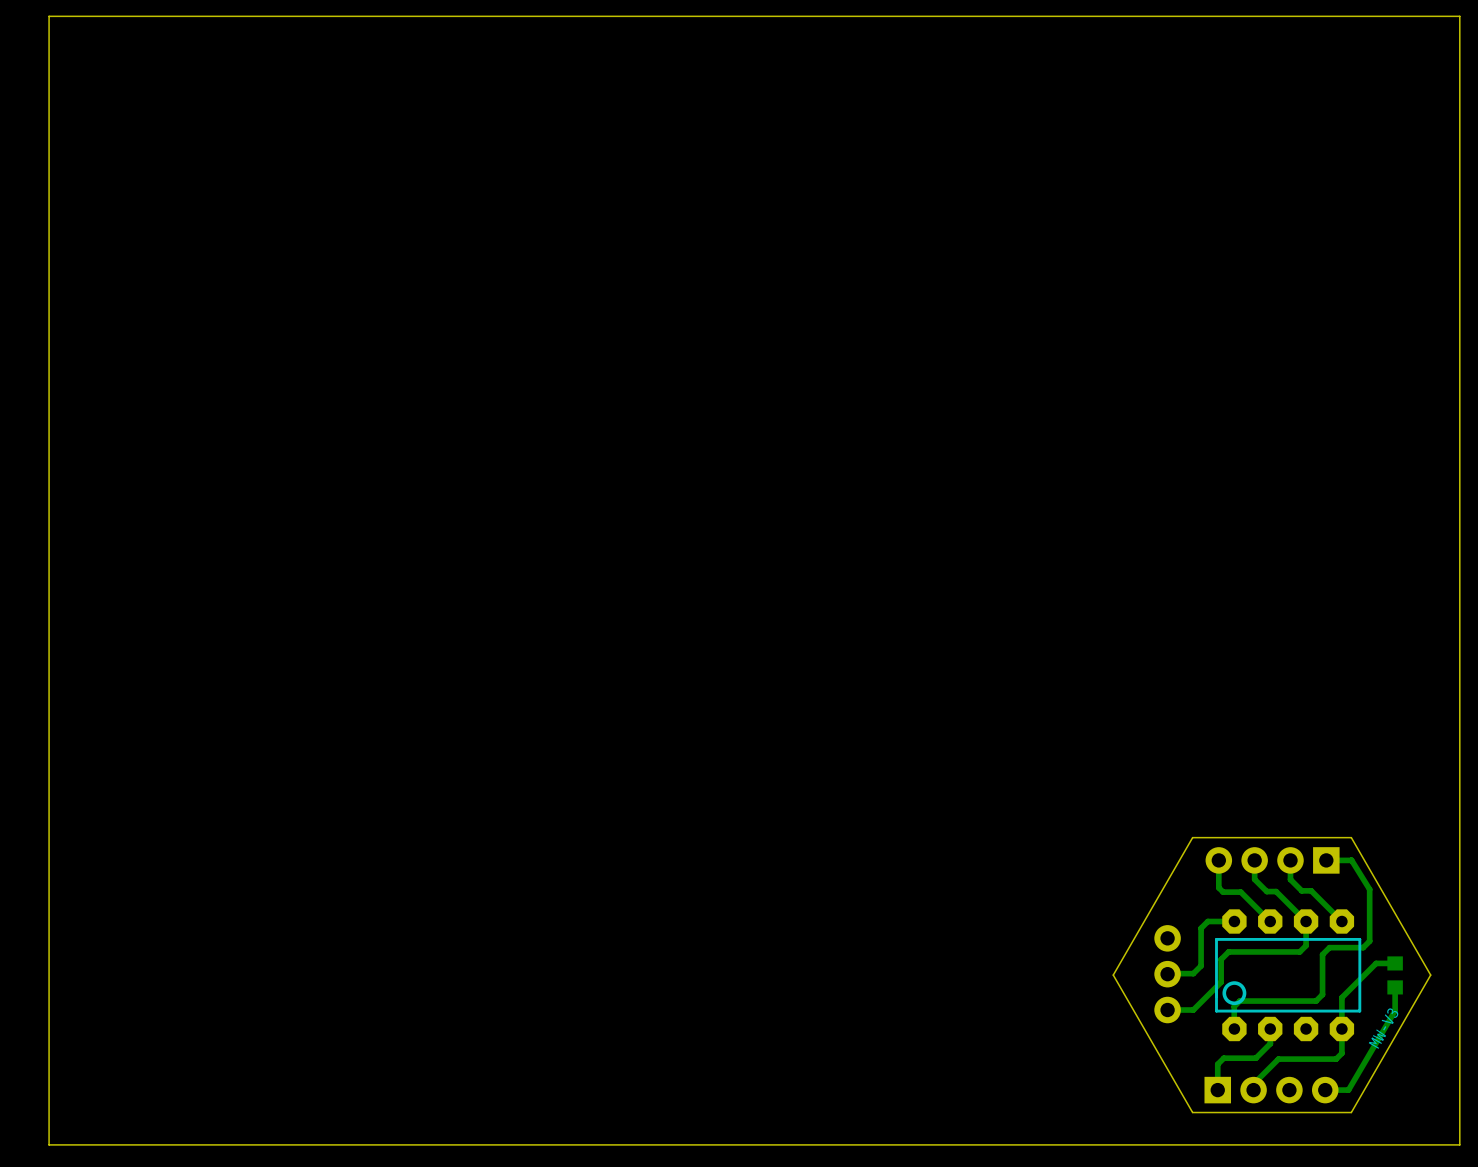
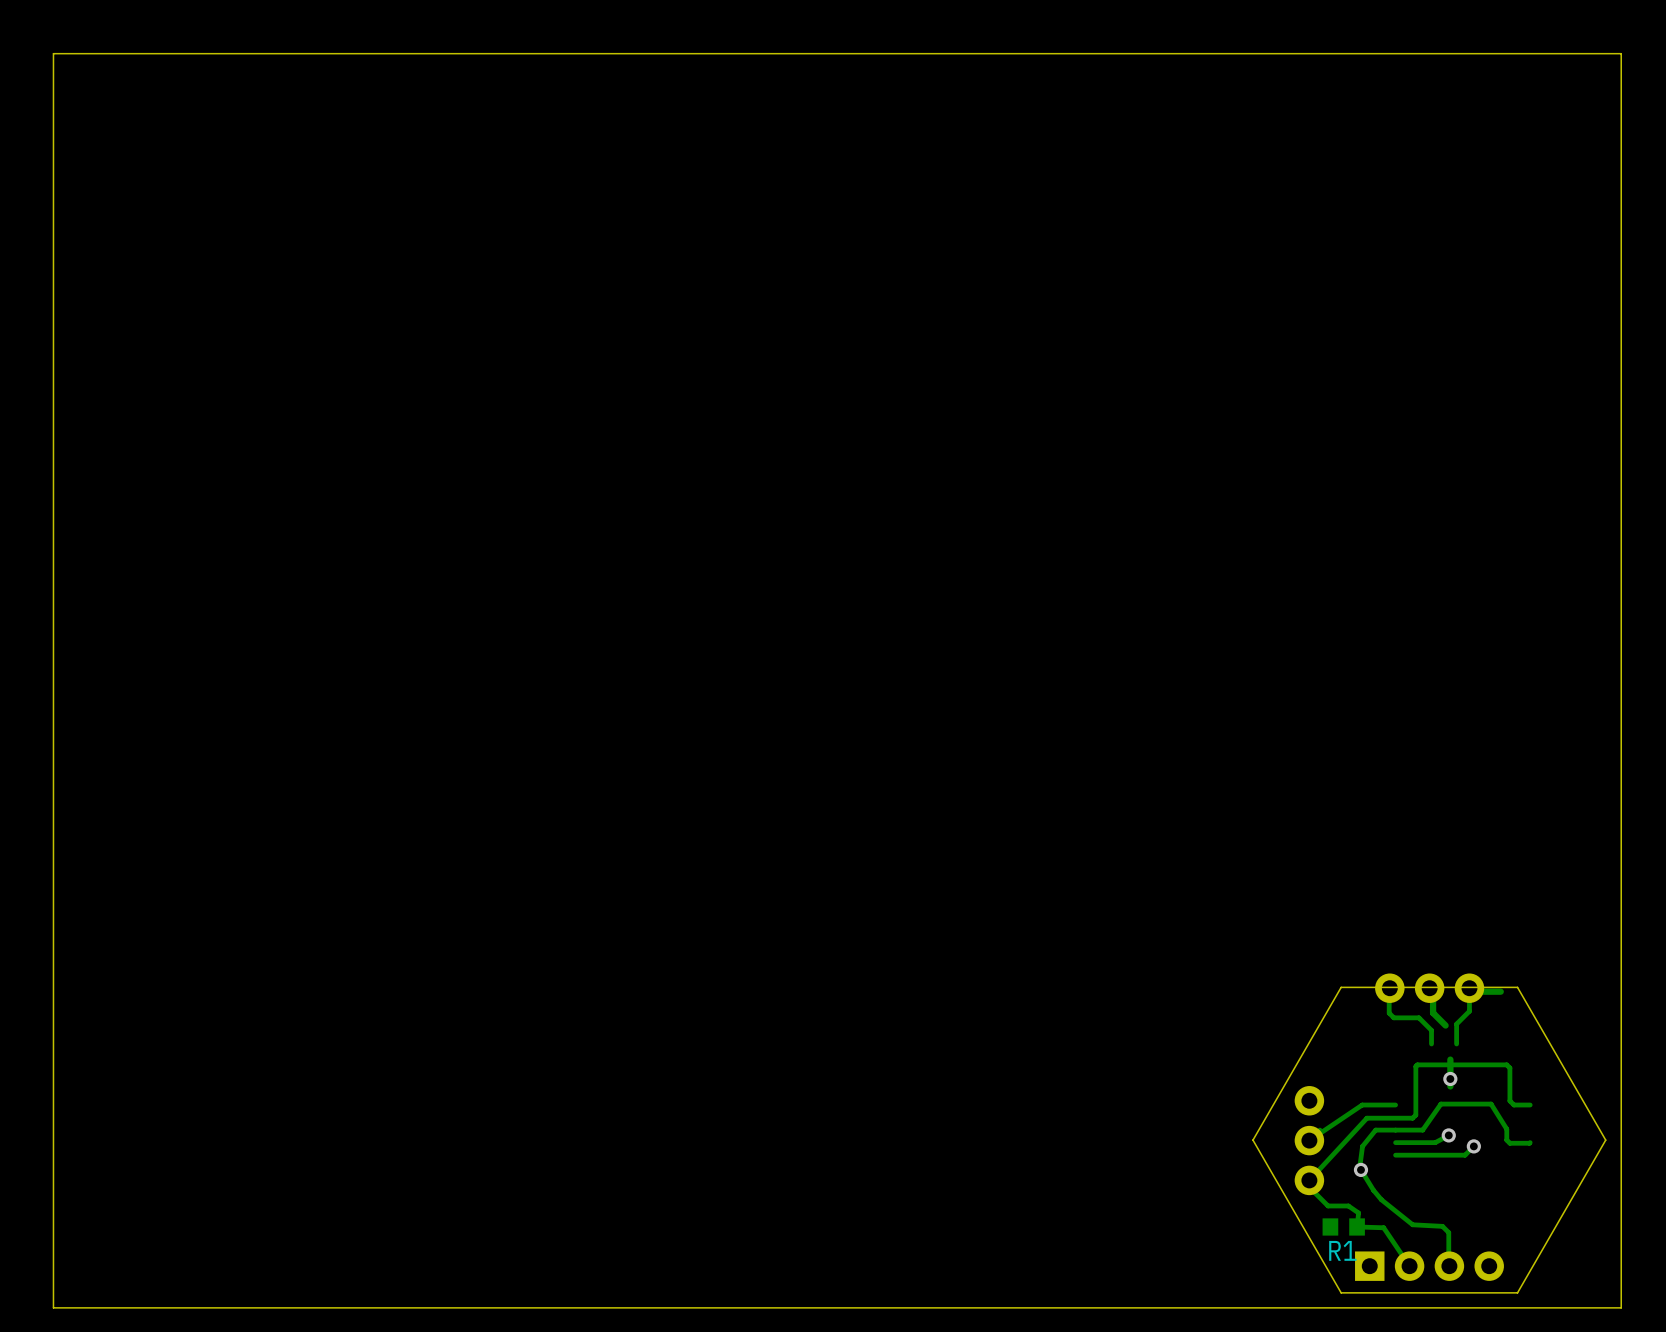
board edge: (1351, 837) (1192, 837) (1113, 975) (1192, 1112) (1351, 1112) (1430, 975) (1351, 837) -> (1517, 987) (1341, 987) (1252, 1140) (1341, 1292) (1517, 1292) (1605, 1140) (1517, 987)
track: none -> (1389, 988) (1389, 1013) (1393, 1017) (1418, 1017) (1431, 1030) (1431, 1043)
part: none -> (1429, 988)
track: none -> (1469, 988) (1469, 1011) (1456, 1024) (1456, 1043)
track: (1218, 860) (1218, 887) (1223, 892) (1240, 892) (1270, 921) -> none
track: (1254, 860) (1254, 879) (1266, 891) (1276, 891) (1306, 921) -> none
part: (1272, 860) -> none
track: (1351, 860) (1369, 889) (1369, 941) (1363, 947) (1329, 947) (1322, 954) (1322, 994) (1316, 1001) (1239, 1001) (1234, 1006) (1234, 1028) -> none
track: (1301, 890) (1311, 890) (1341, 921) -> none
track: (1234, 921) (1207, 921) (1201, 928) (1201, 965) (1193, 973) (1167, 974) -> none
via: none -> (1450, 1078)
track: (1306, 945) (1299, 951) (1228, 951) (1221, 959) (1221, 982) (1193, 1010) (1167, 1010) -> none
track: none -> (1395, 1105) (1362, 1105) (1309, 1140) (1319, 1130)
track: none -> (1530, 1105) (1513, 1105) (1509, 1100) (1509, 1068) (1506, 1064) (1417, 1064) (1415, 1066) (1415, 1115) (1412, 1118) (1366, 1118) (1309, 1180) (1309, 1187) (1328, 1205) (1348, 1205) (1358, 1213) (1357, 1226) (1383, 1227) (1409, 1266)
track: (1395, 963) (1376, 963) (1341, 997) (1341, 1053) (1336, 1059) (1278, 1059) (1256, 1080) (1256, 1086) (1253, 1090) -> none
part position: (1167, 974) -> (1309, 1140)
part: (1288, 975) -> none
part: (1395, 975) -> none
track: (1395, 987) (1395, 1010) (1348, 1090) (1325, 1090) -> none
track: none -> (1448, 1135) (1435, 1142) (1395, 1142)
via: none -> (1448, 1135)
track: none -> (1530, 1142) (1509, 1143) (1506, 1140) (1506, 1129) (1491, 1104) (1440, 1104) (1422, 1130) (1375, 1130) (1362, 1146) (1359, 1169) (1381, 1199) (1412, 1224) (1442, 1226) (1448, 1232) (1449, 1266)
track: none -> (1473, 1146) (1465, 1155) (1395, 1155)
via: none -> (1473, 1146)
via: none -> (1360, 1169)
text: MW-V3 (1383, 1028) -> none
track: (1270, 1029) (1270, 1043) (1255, 1058) (1223, 1058) (1217, 1064) (1217, 1090) -> none
R1: none -> (1343, 1226)
part position: (1271, 1090) -> (1429, 1266)

